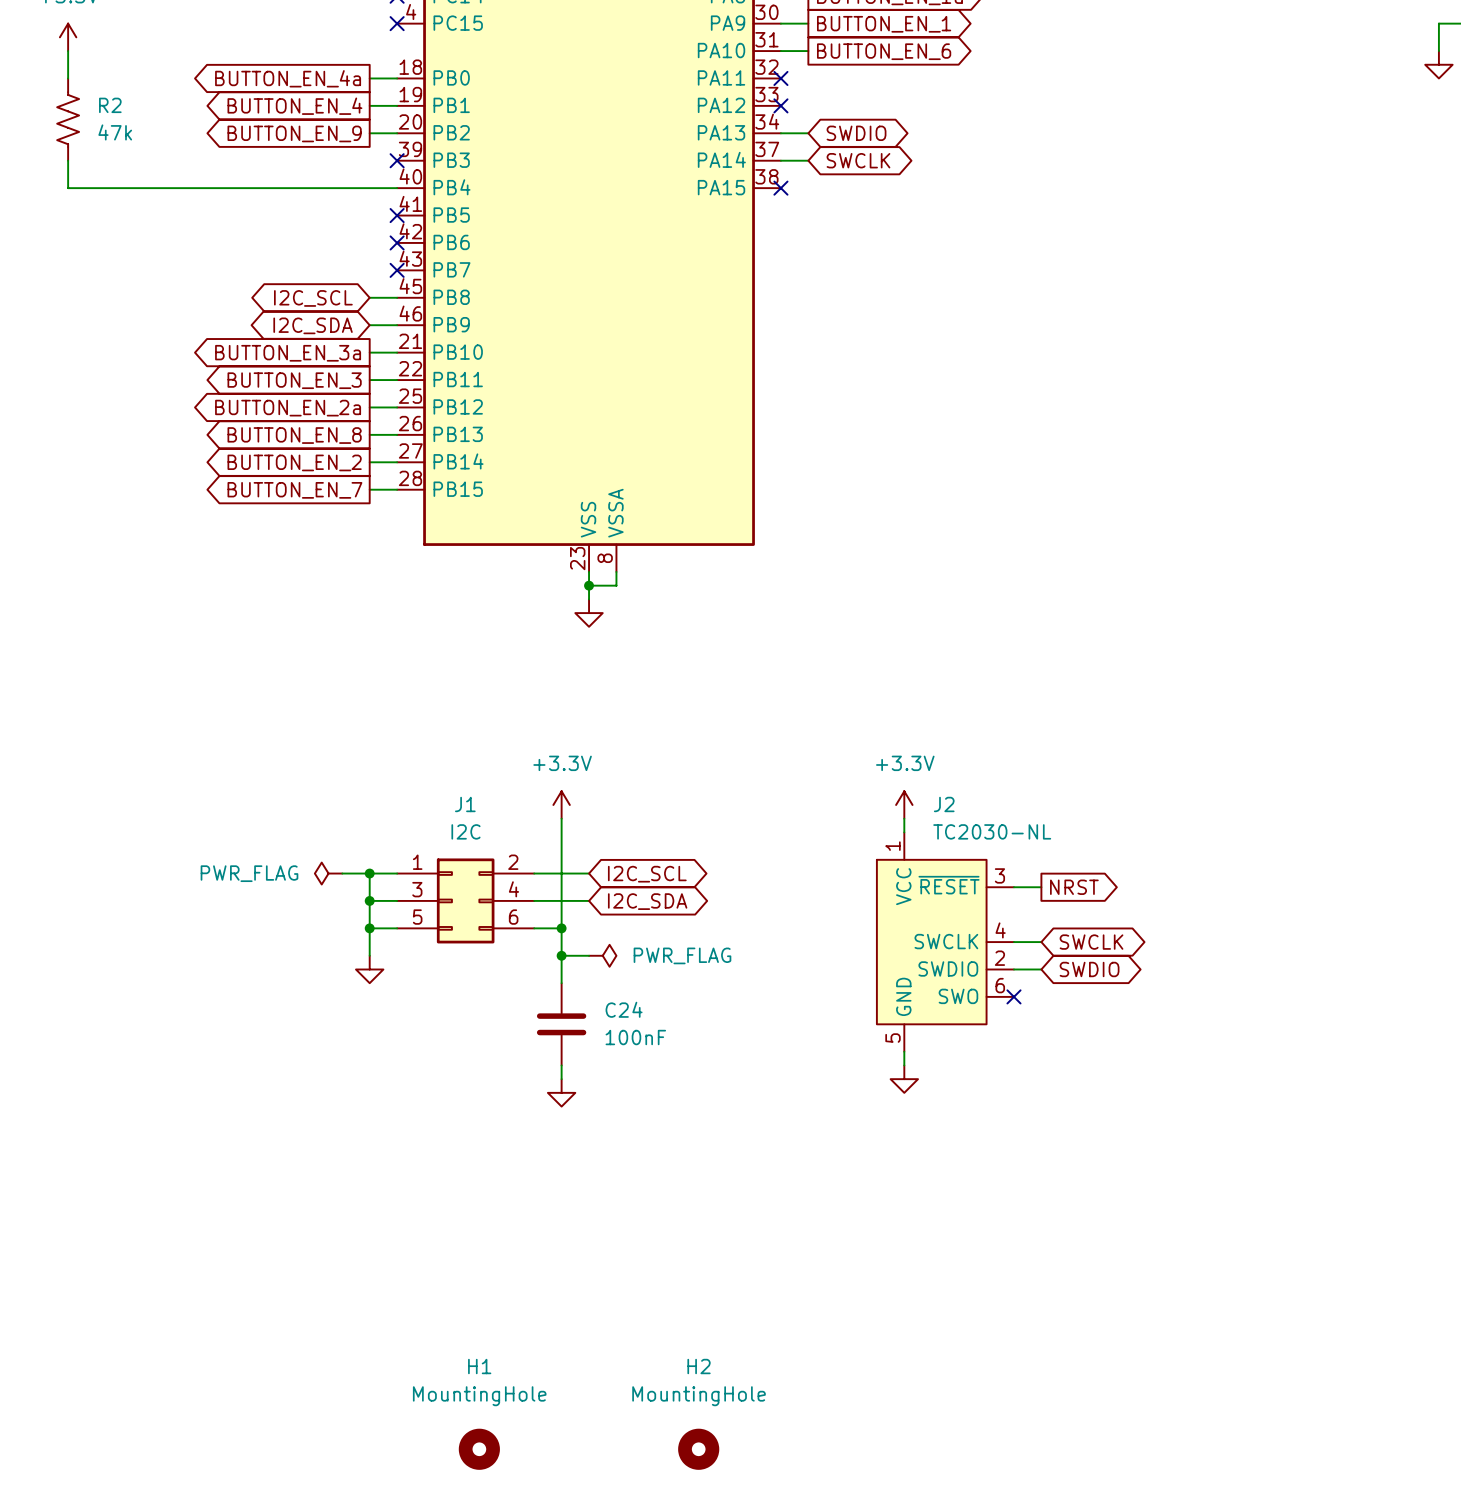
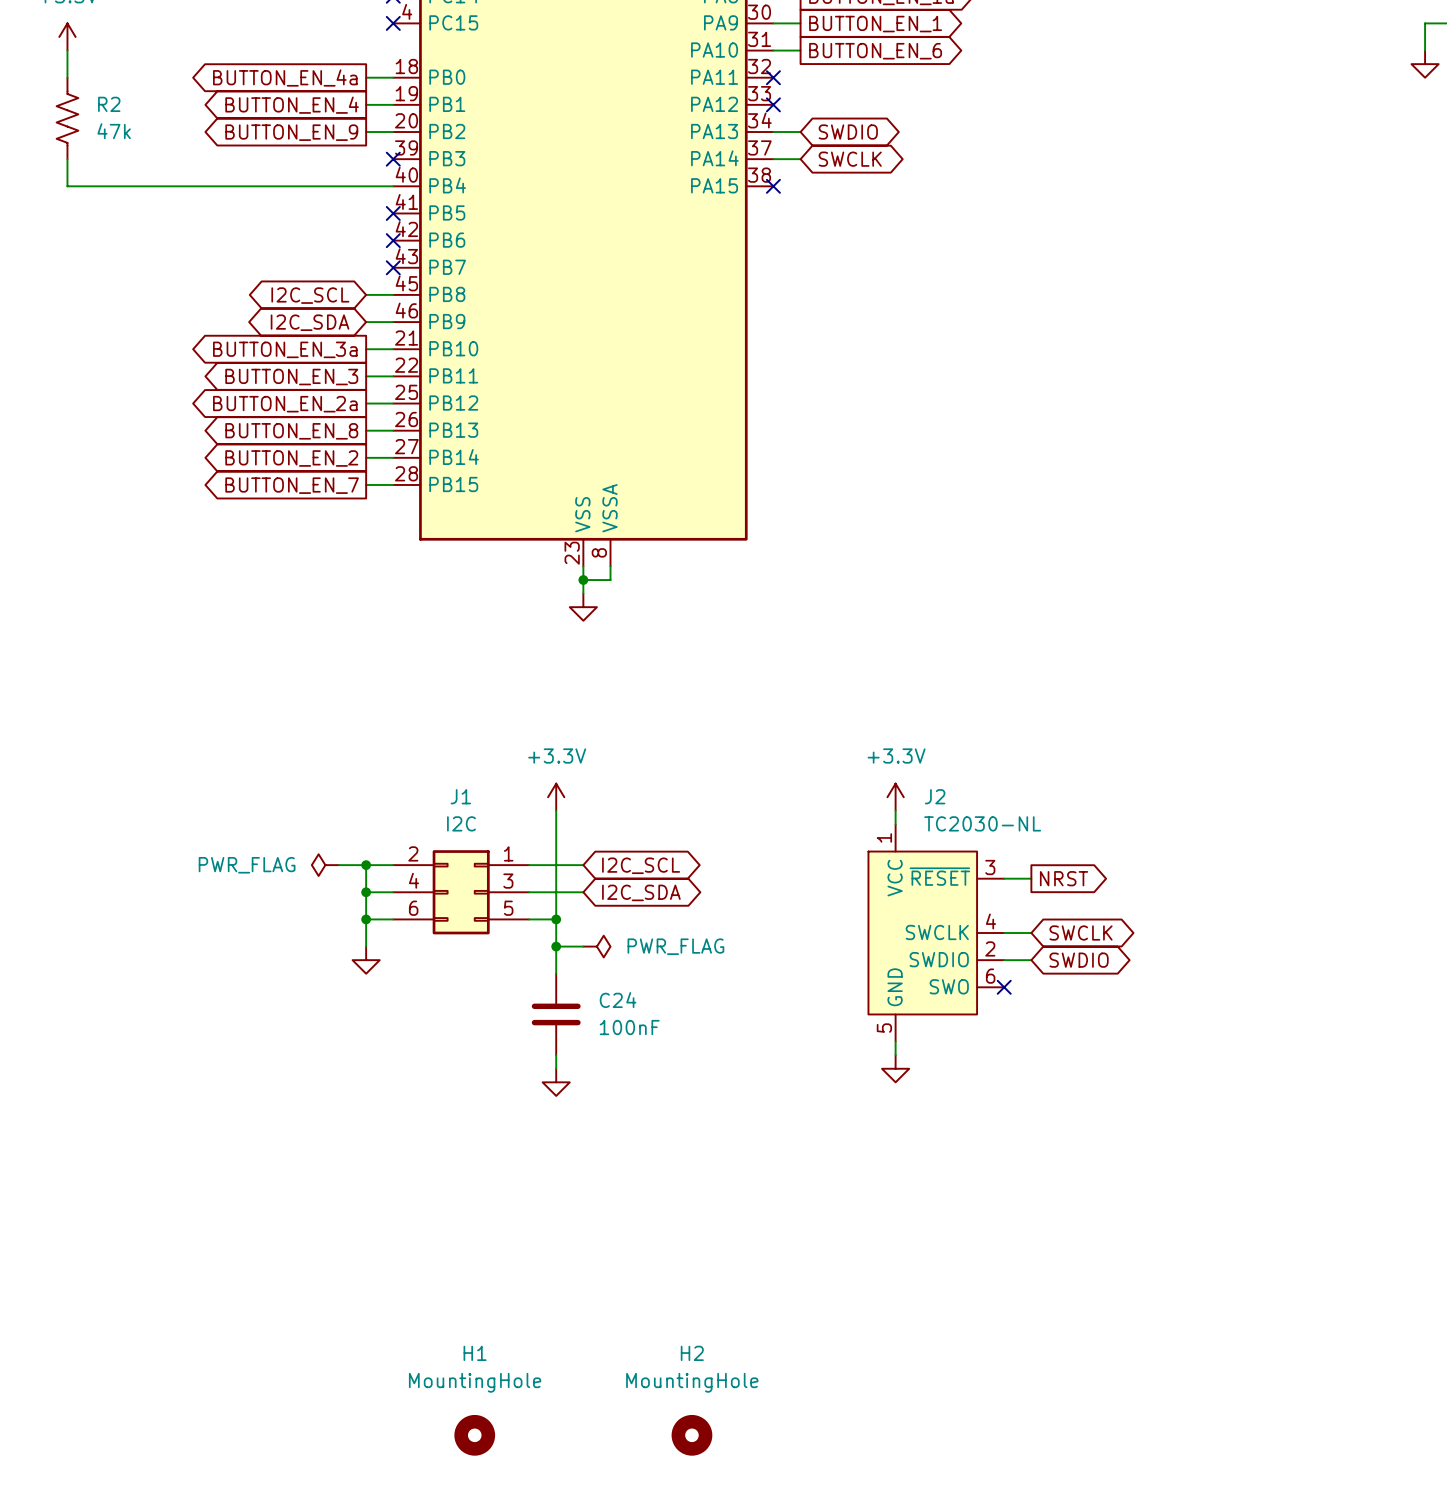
J1 flip: as is (465, 900) -> left-right (461, 892)

